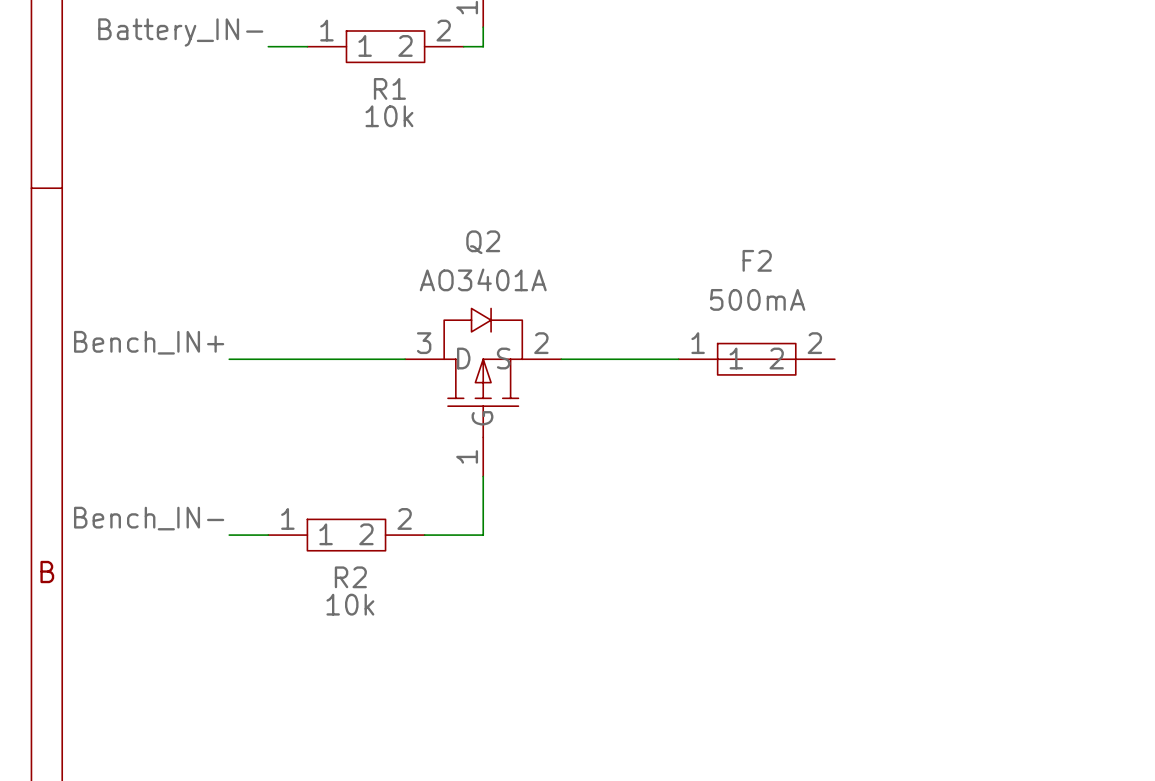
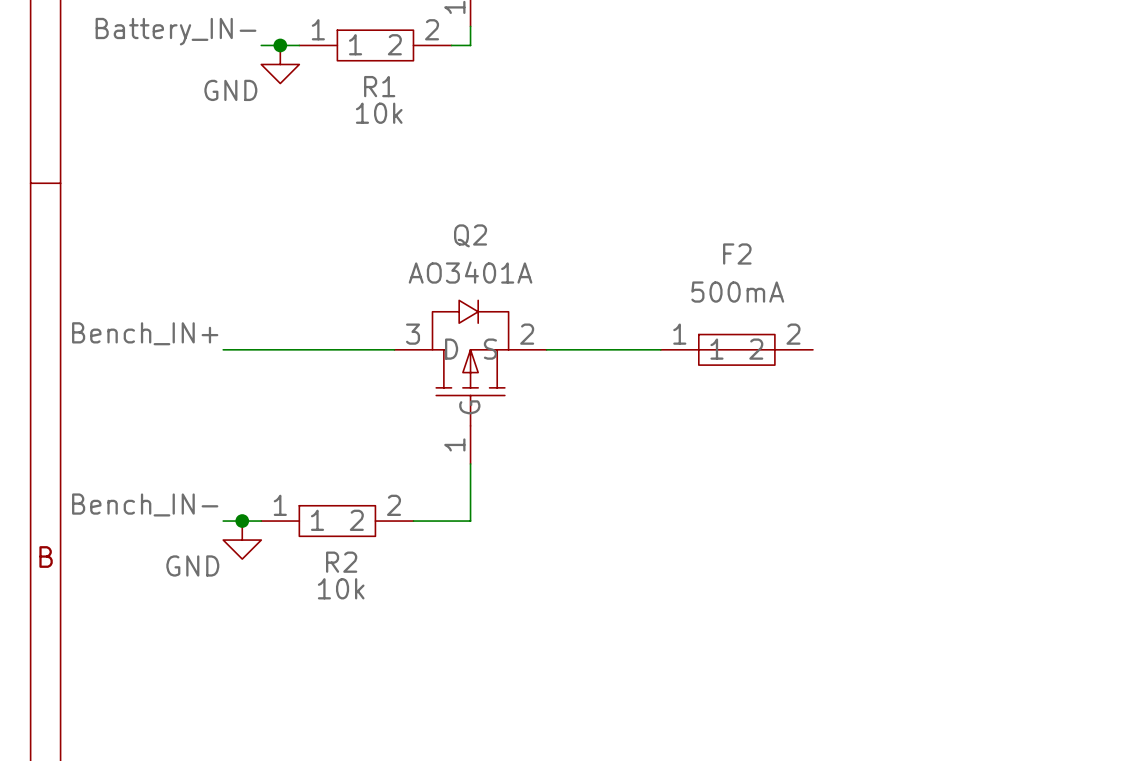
junction: none -> (280, 45)
power symbol: none -> GND (280, 64)
junction: none -> (242, 521)
power symbol: none -> GND (242, 540)

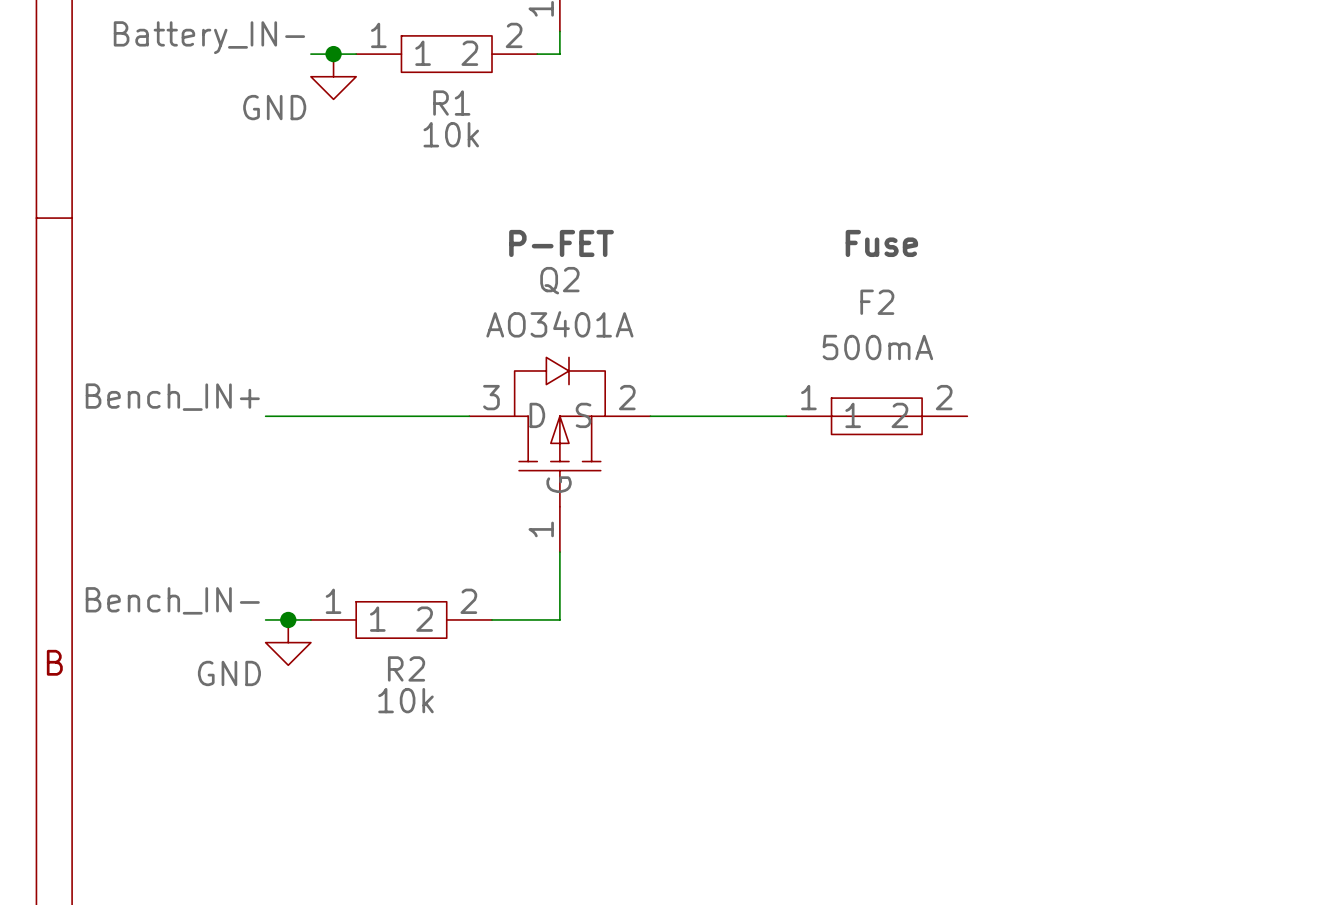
text: none -> P-FET (561, 243)
text: none -> Fuse (881, 243)

